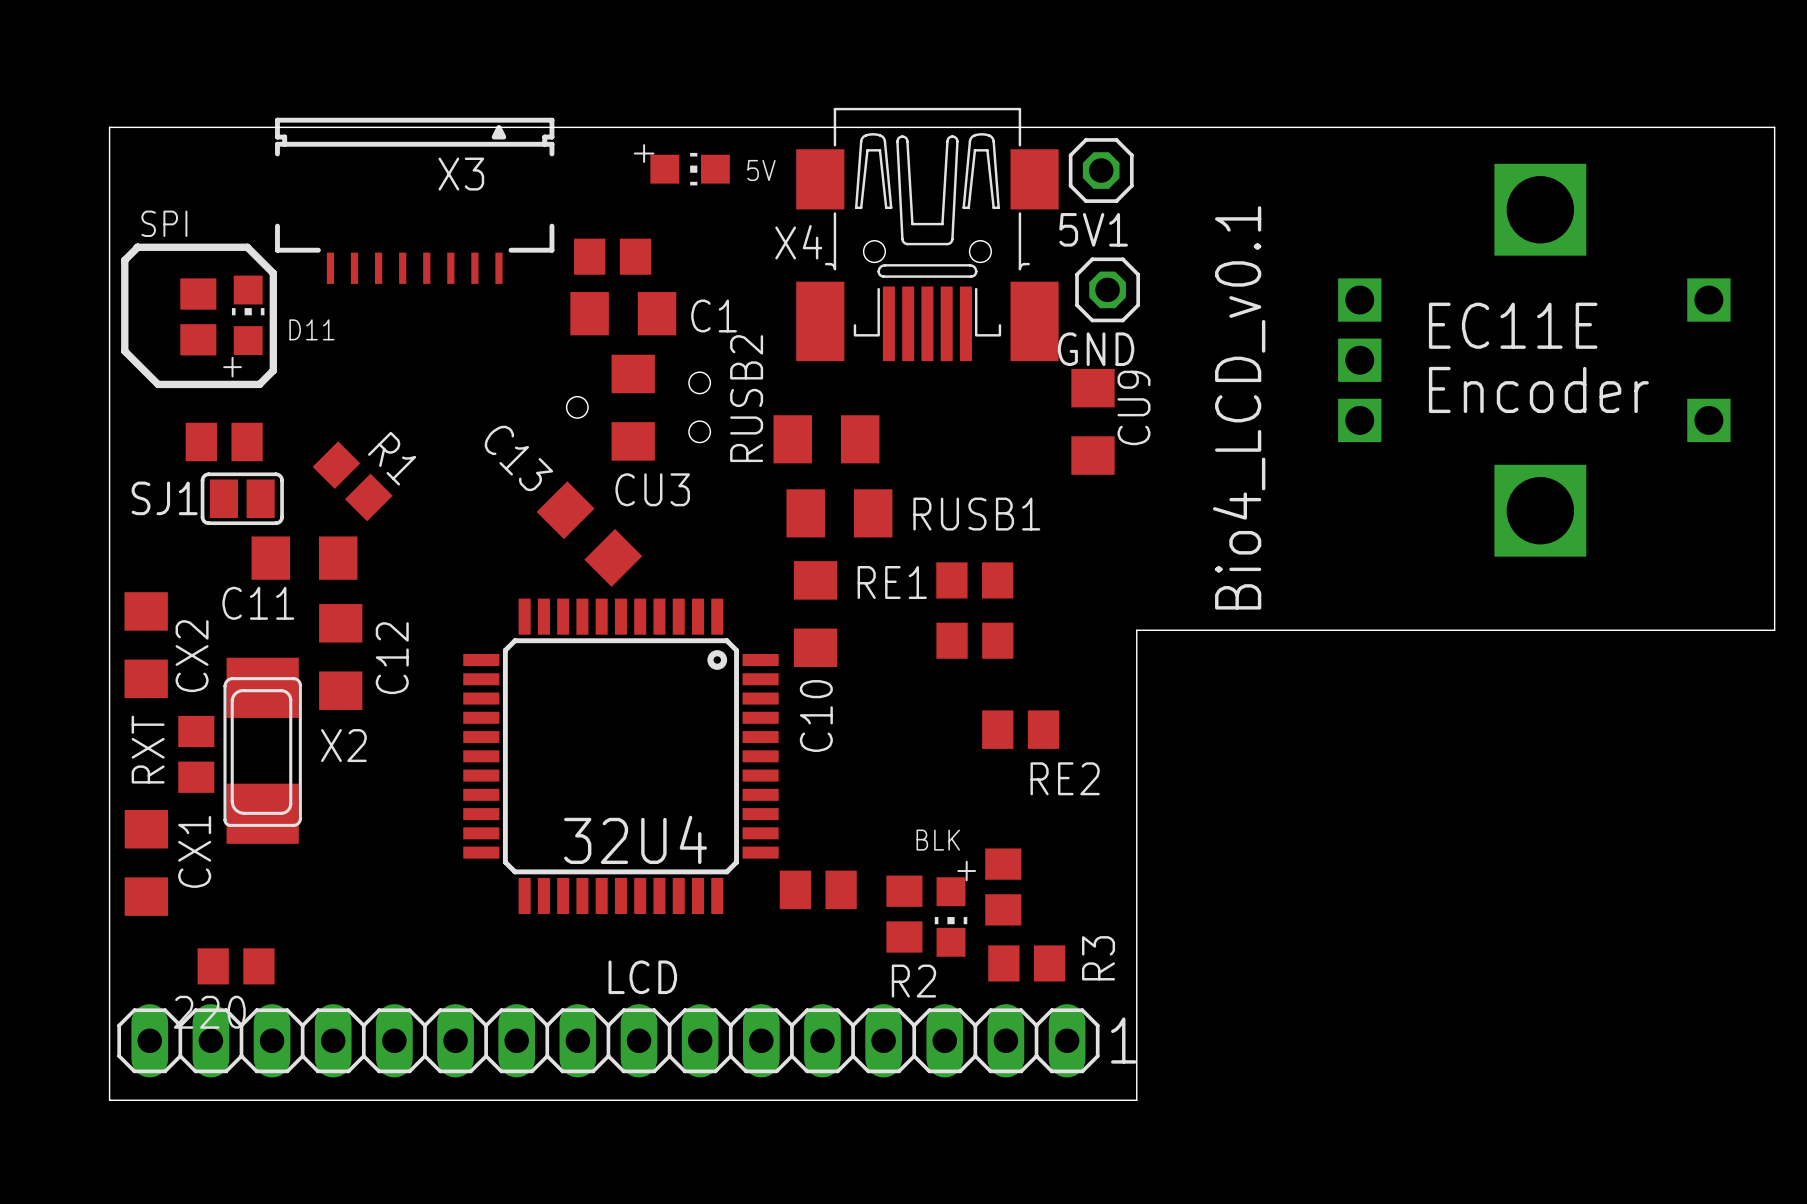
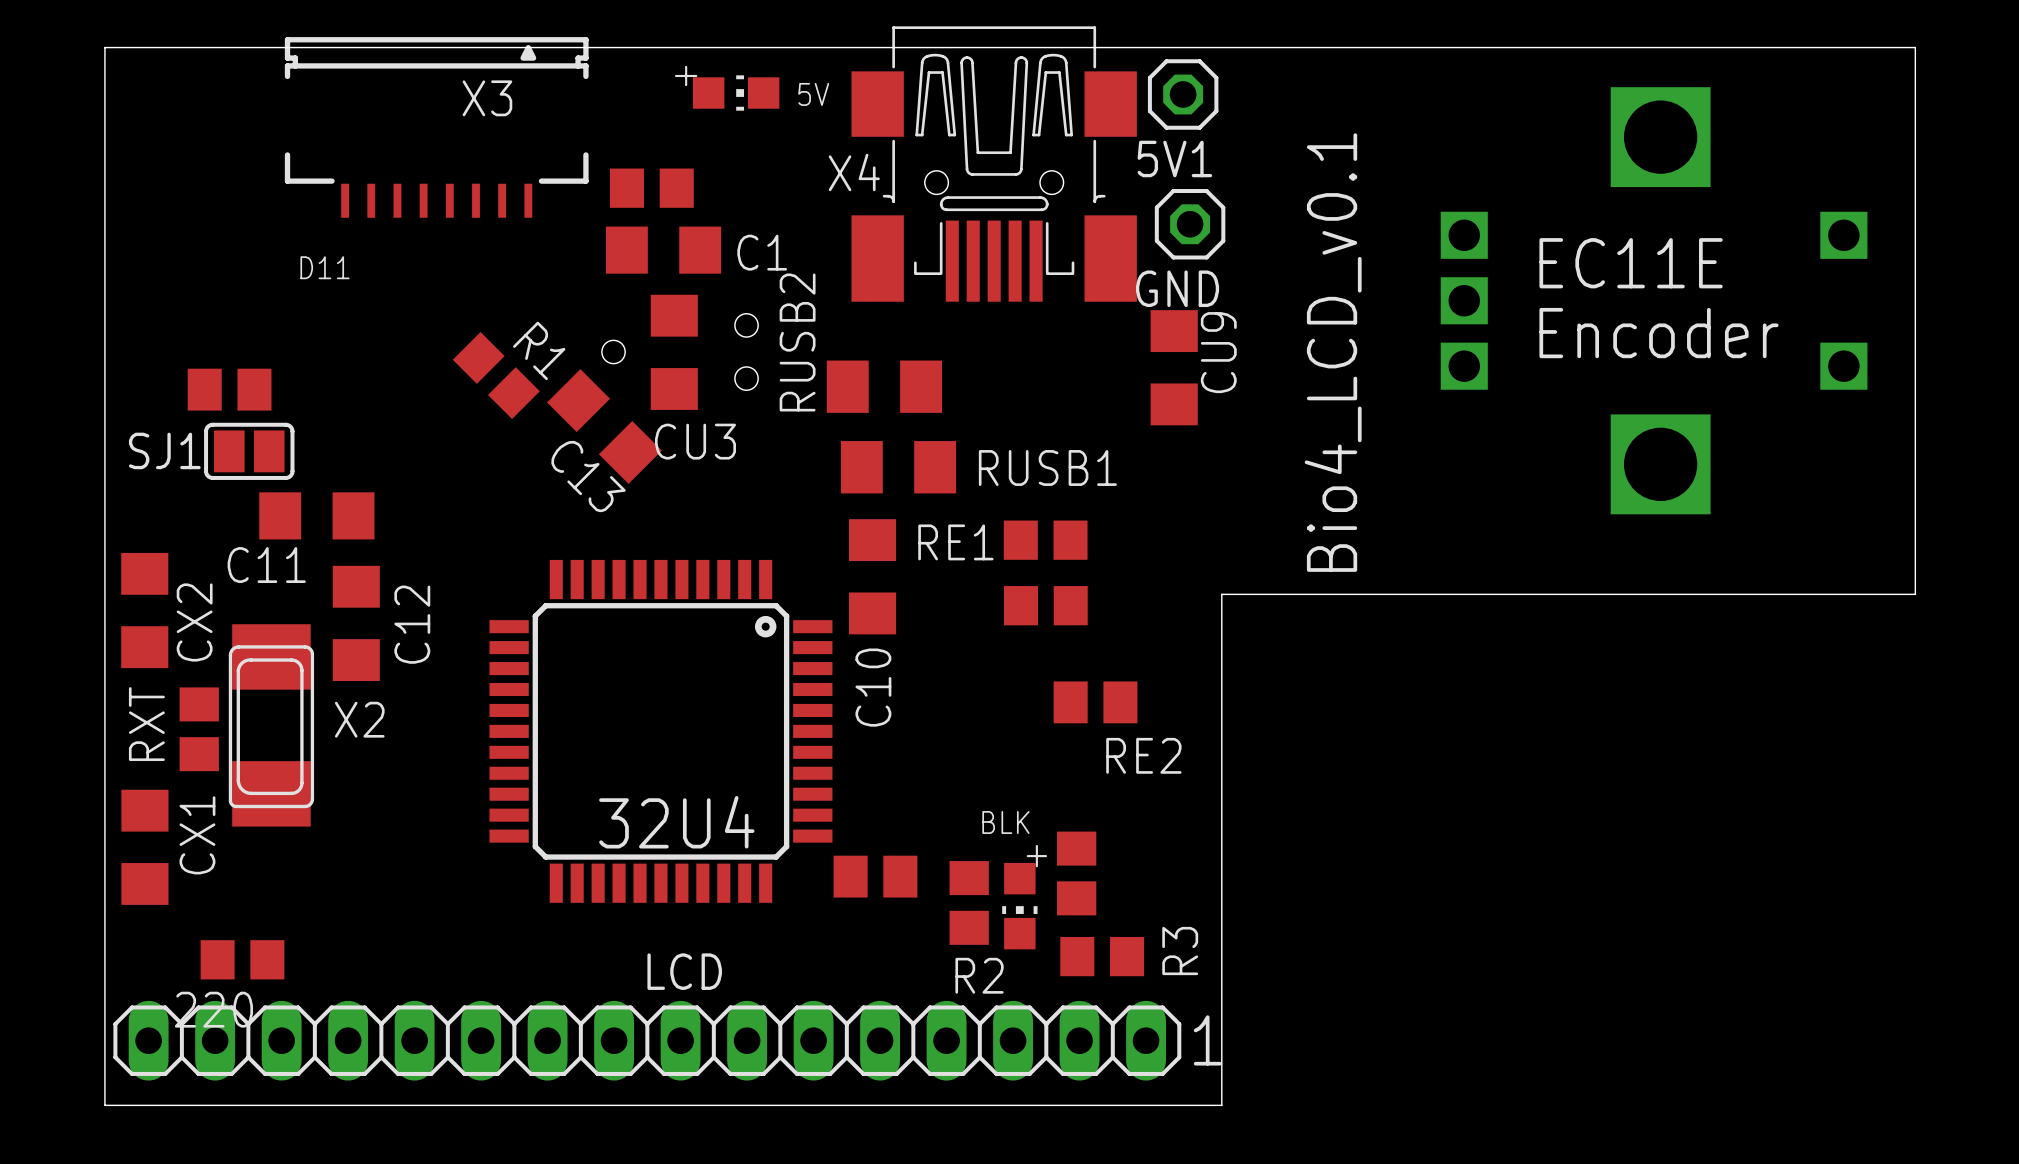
text: SPI (164, 223) -> none
line: (136, 247) (247, 247) (273, 273) (273, 370) (259, 384) (158, 384) (124, 351) (124, 260) (137, 247) -> none
part: (248, 315) -> none
part: (198, 316) -> none
C13 name position: C13 (518, 458) -> C13 (588, 476)
R1 position: (352, 481) -> (496, 375)
C13 position: (589, 534) -> (604, 426)

